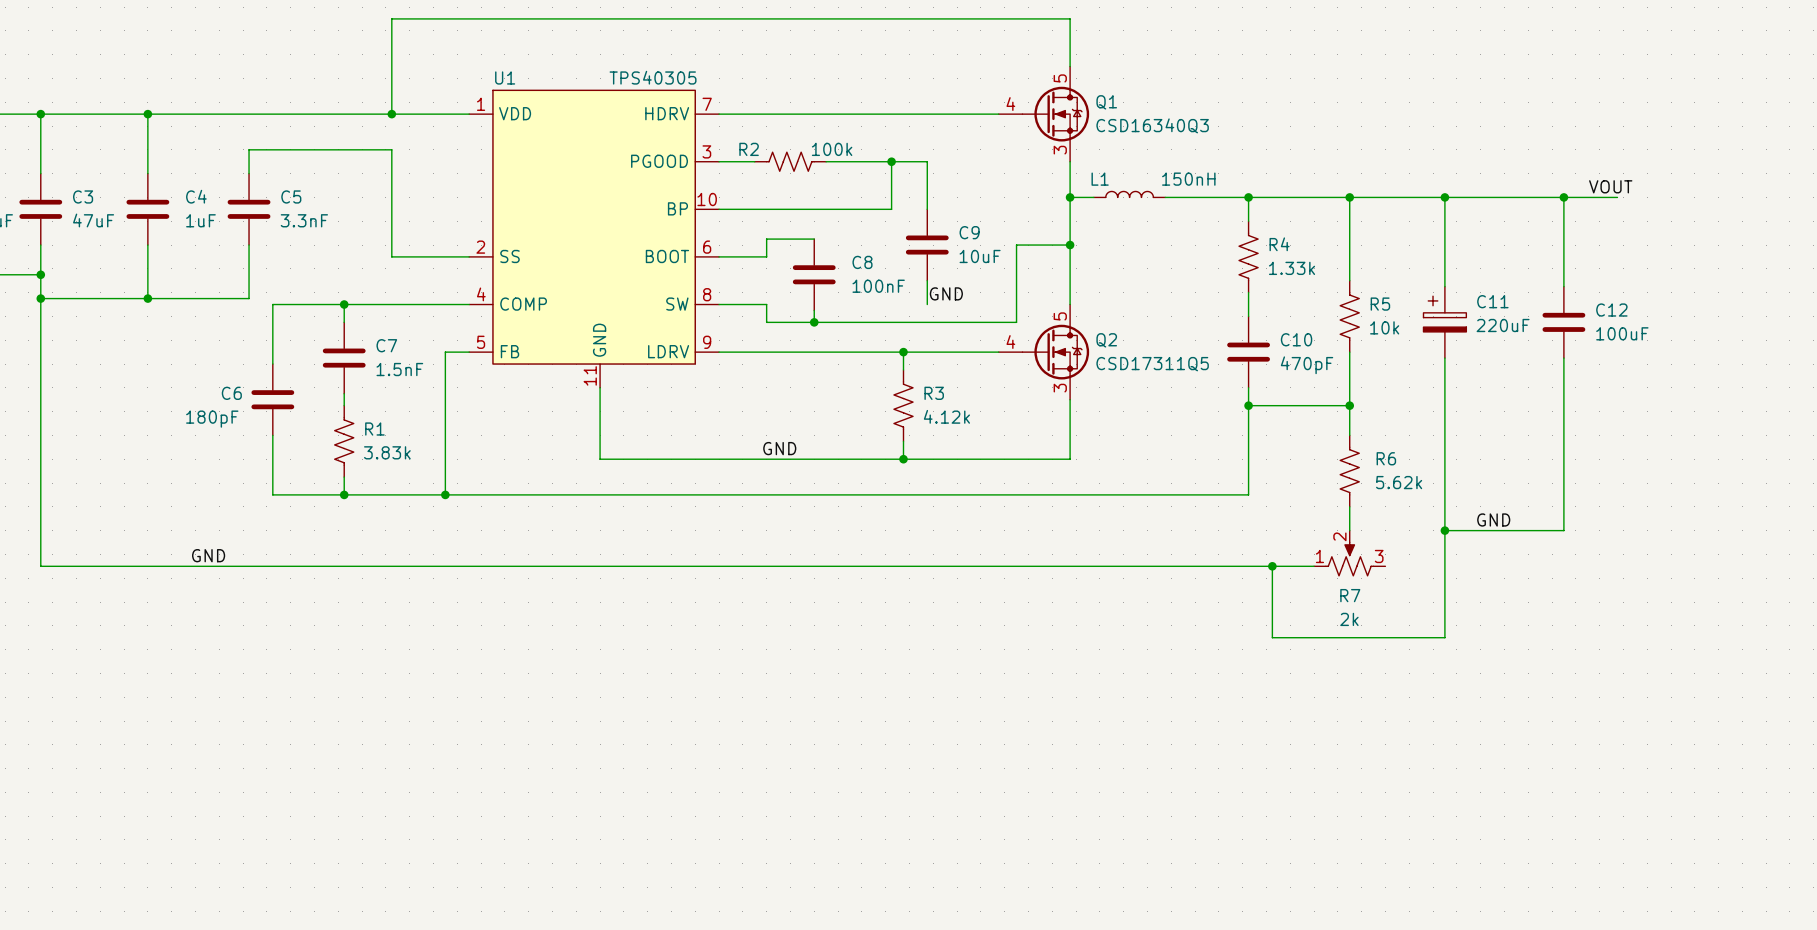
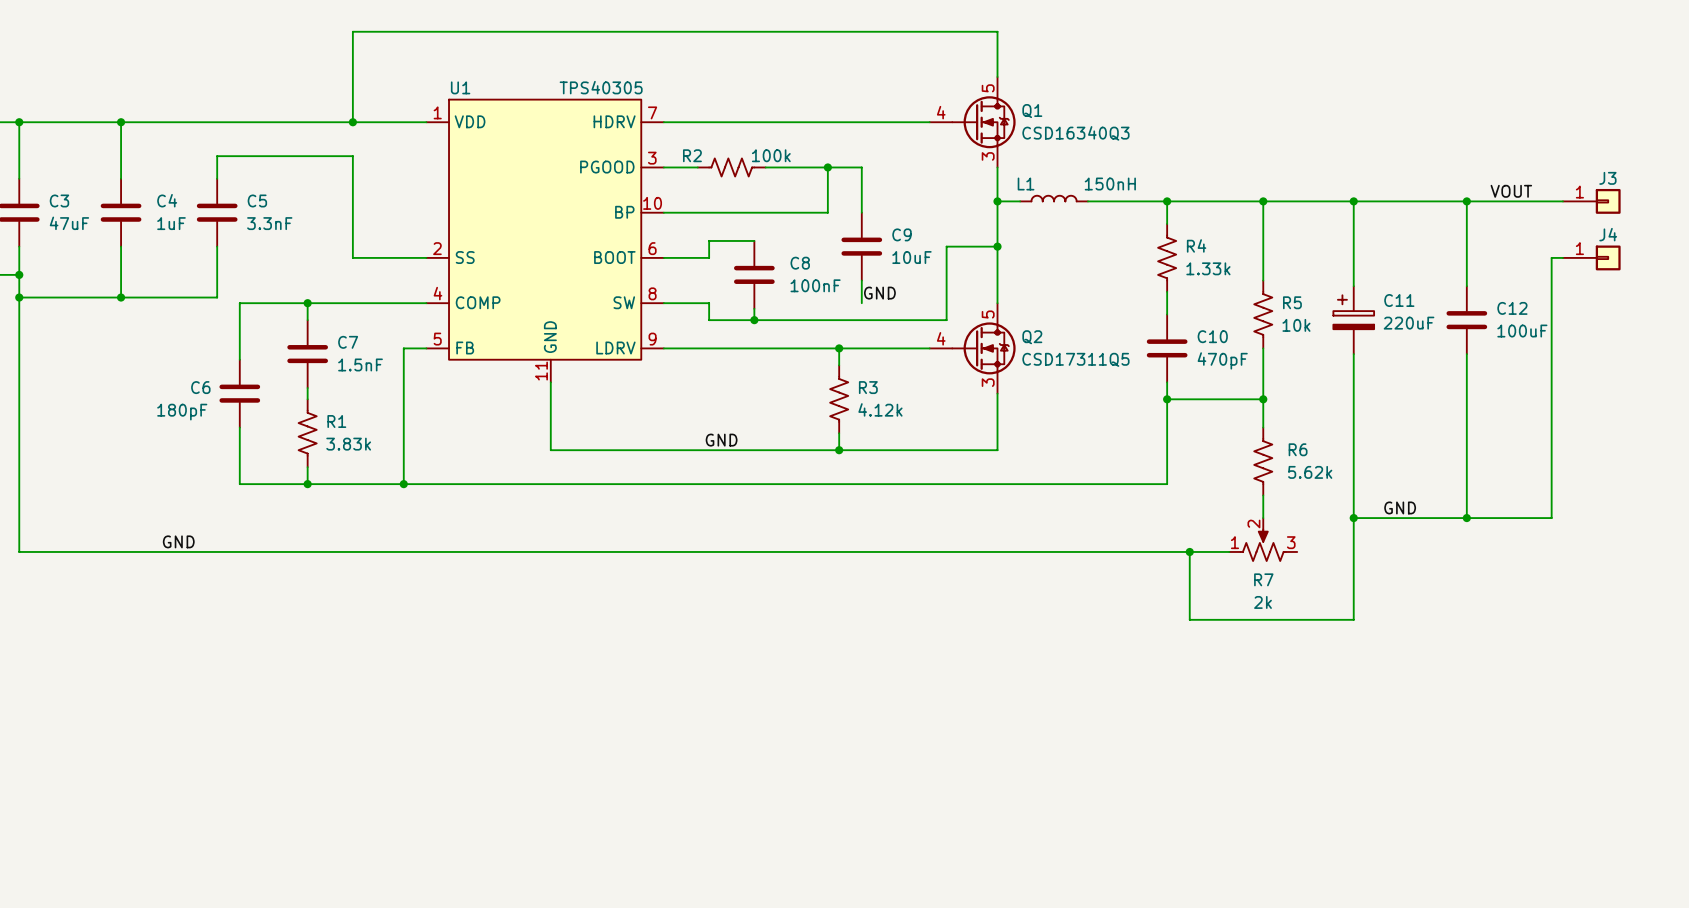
wire: none -> (1517, 201) (1562, 201)
J3: none -> (1591, 201)
wire: none -> (1562, 257) (1551, 257) (1551, 518) (1466, 518)
J4: none -> (1591, 257)
junction: none -> (1466, 518)

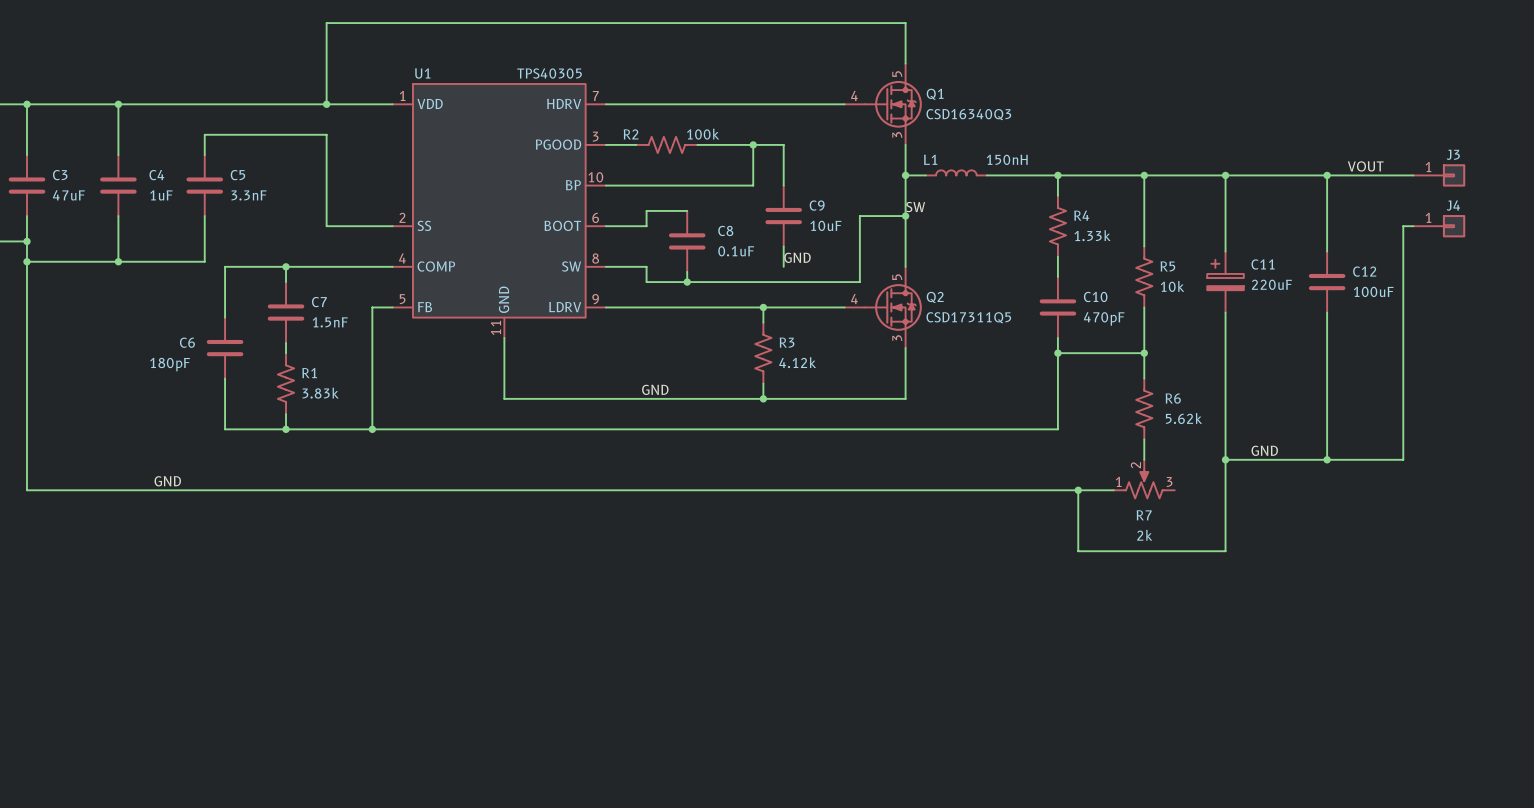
label: none -> SW (915, 207)
C8 value: 100nF (815, 285) -> 0.1uF (736, 251)

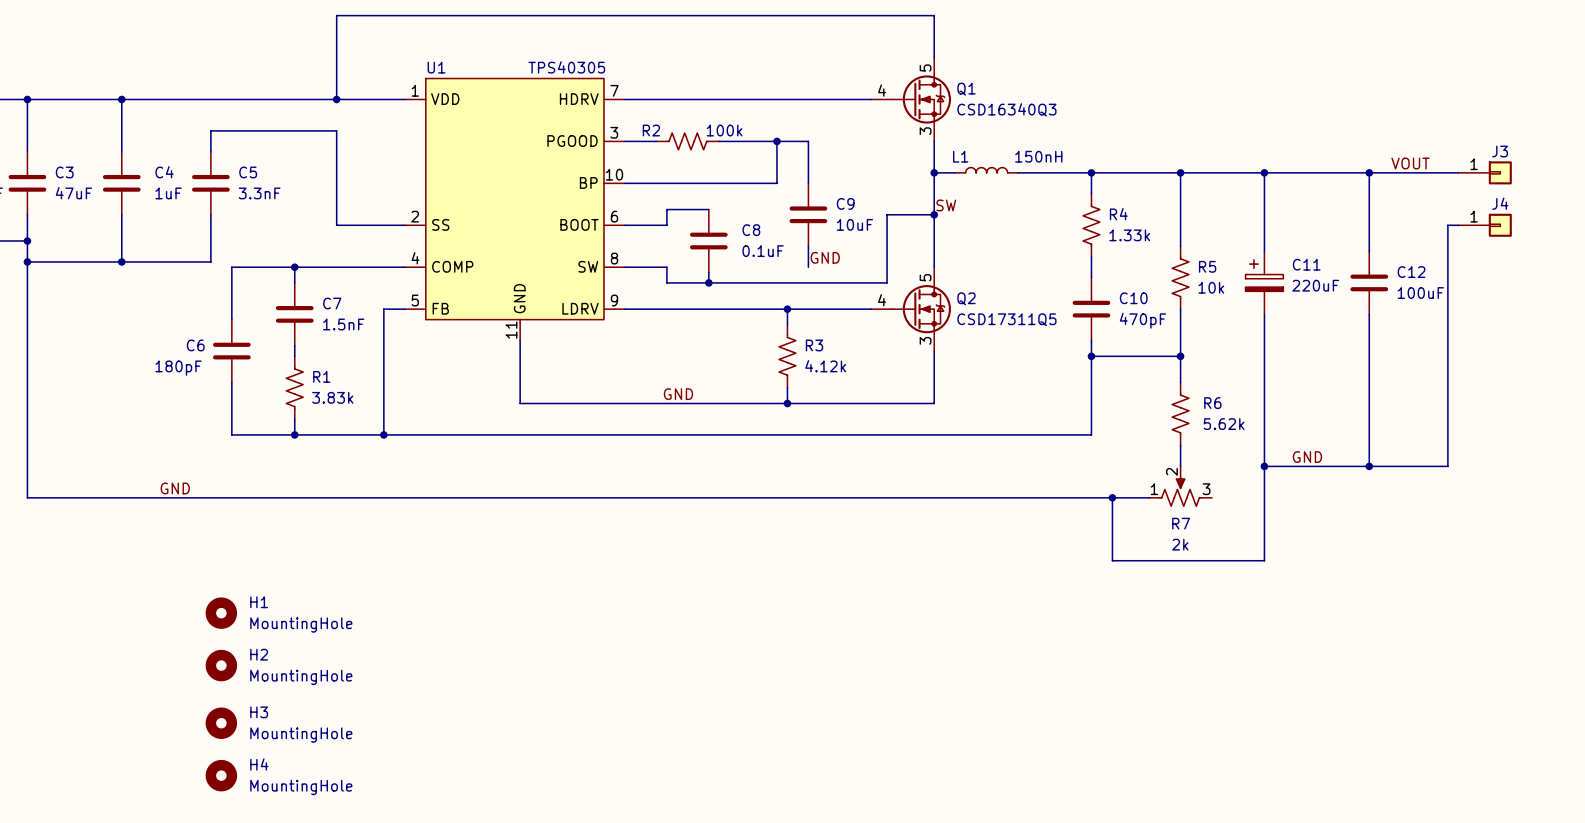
H1: none -> MountingHole (221, 613)
H2: none -> MountingHole (221, 665)
H3: none -> MountingHole (221, 723)
H4: none -> MountingHole (221, 775)

